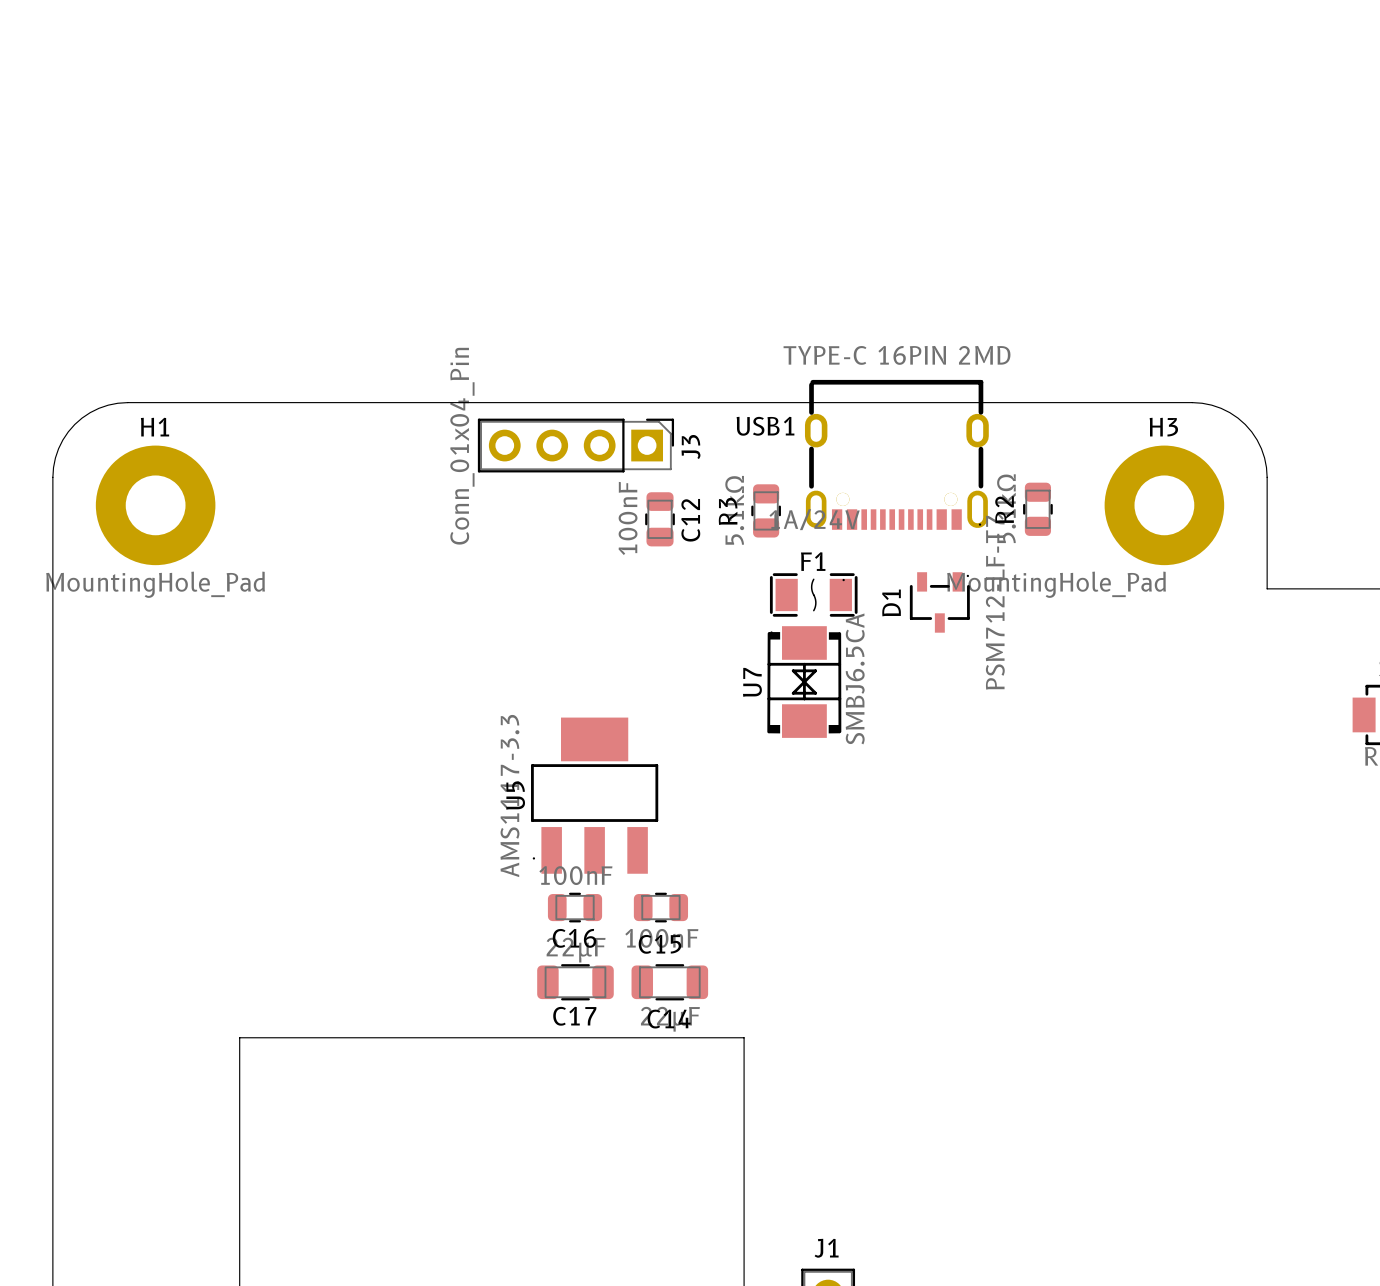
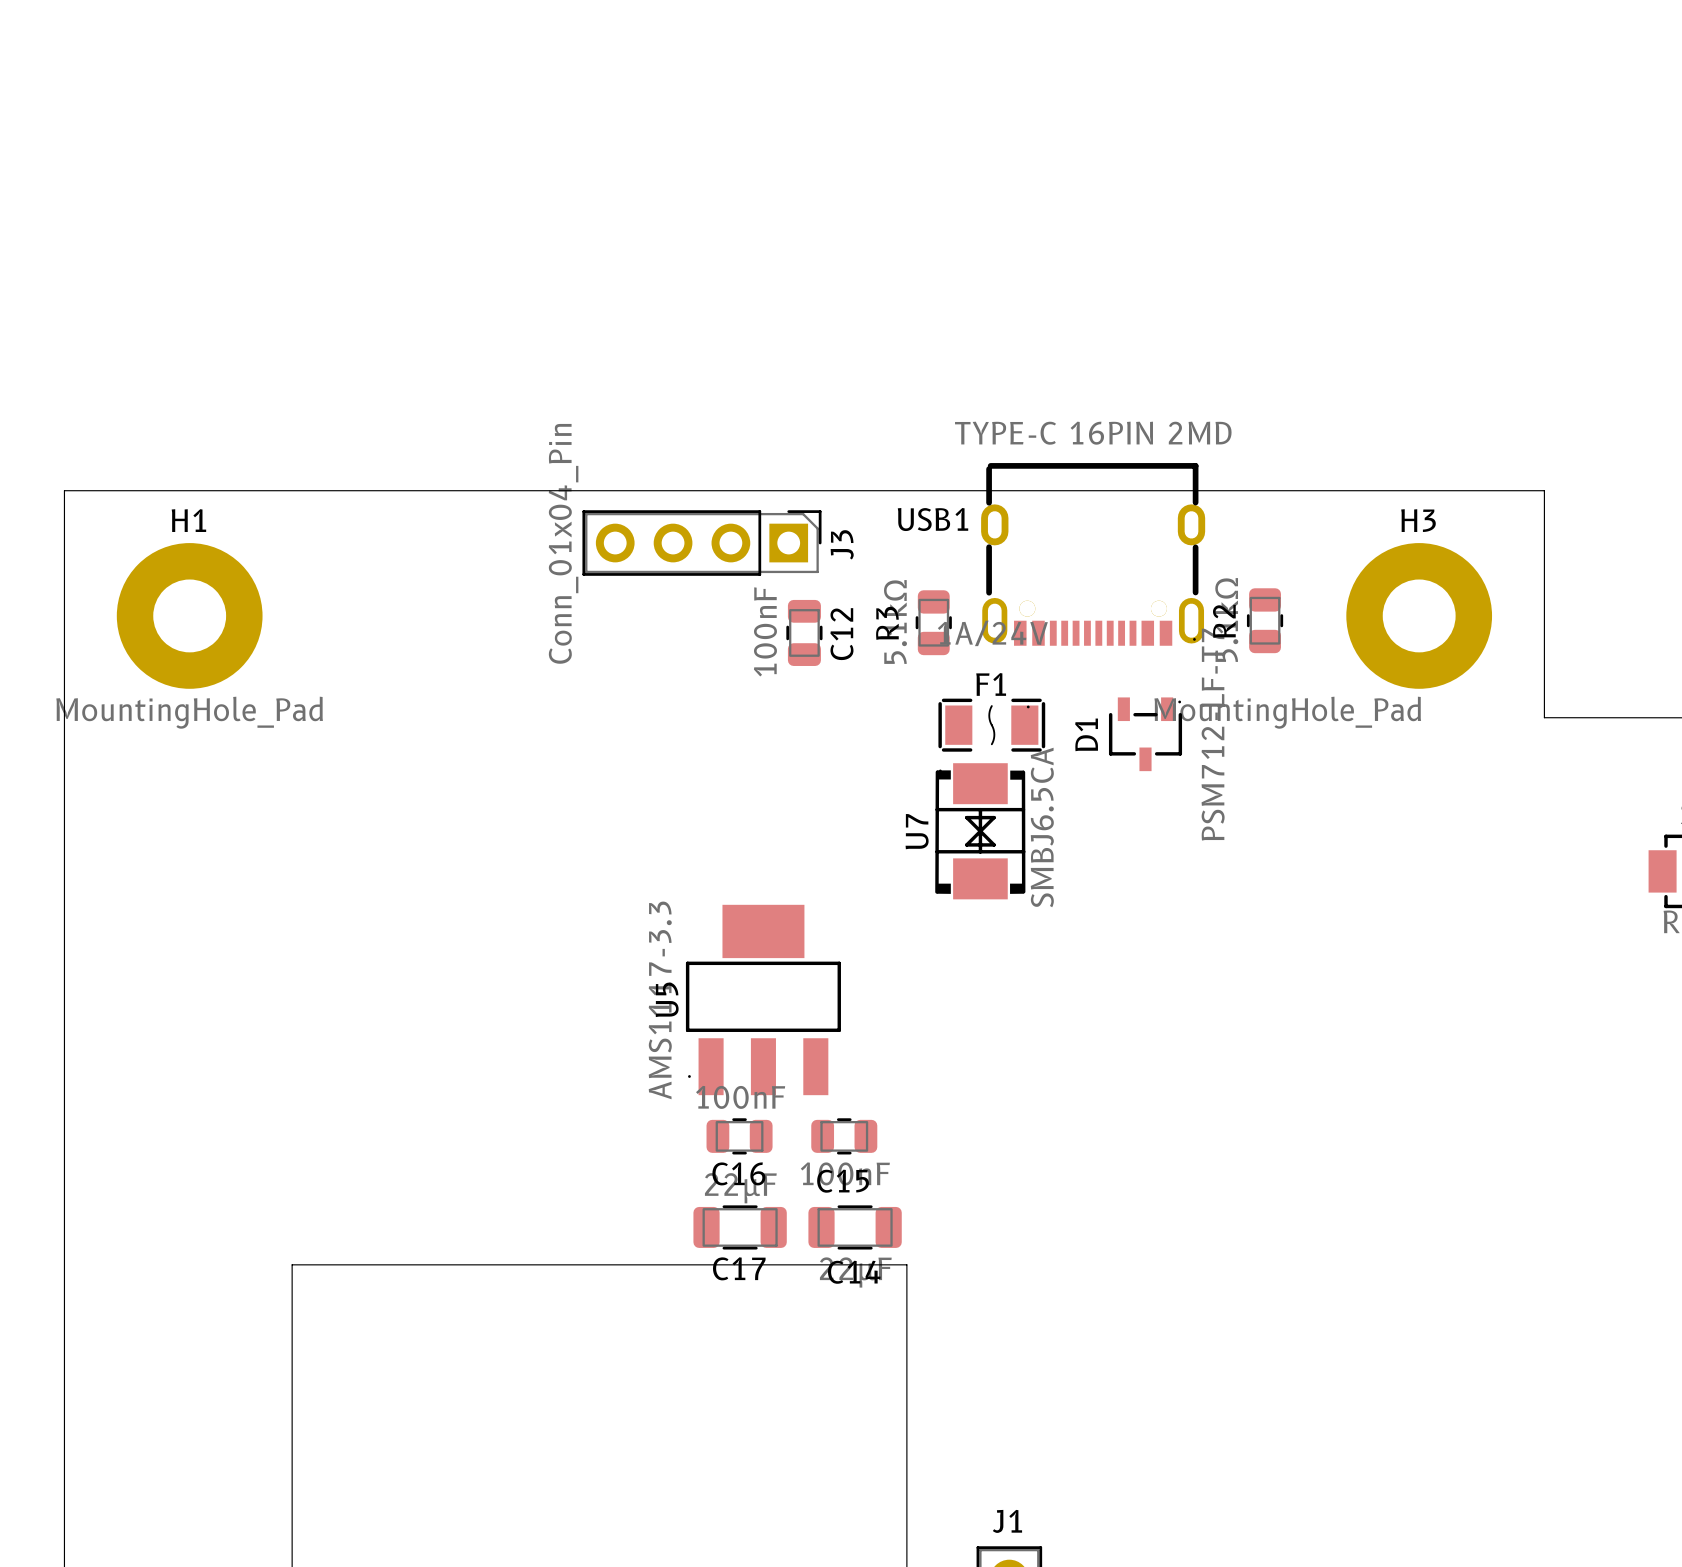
board edge: (127, 402) (99, 408) (74, 424) (58, 448) (52, 477) -> (155, 490) (64, 490) (64, 581)
board edge: (1192, 402) (1221, 408) (1245, 424) (1261, 448) (1267, 477) -> (1453, 490) (1544, 490) (1544, 581)
U5 position: (594, 795) -> (763, 999)
C16 position: (575, 907) -> (739, 1136)
C15 position: (660, 907) -> (844, 1136)
C17 position: (575, 982) -> (740, 1227)
C14 position: (669, 982) -> (855, 1227)

